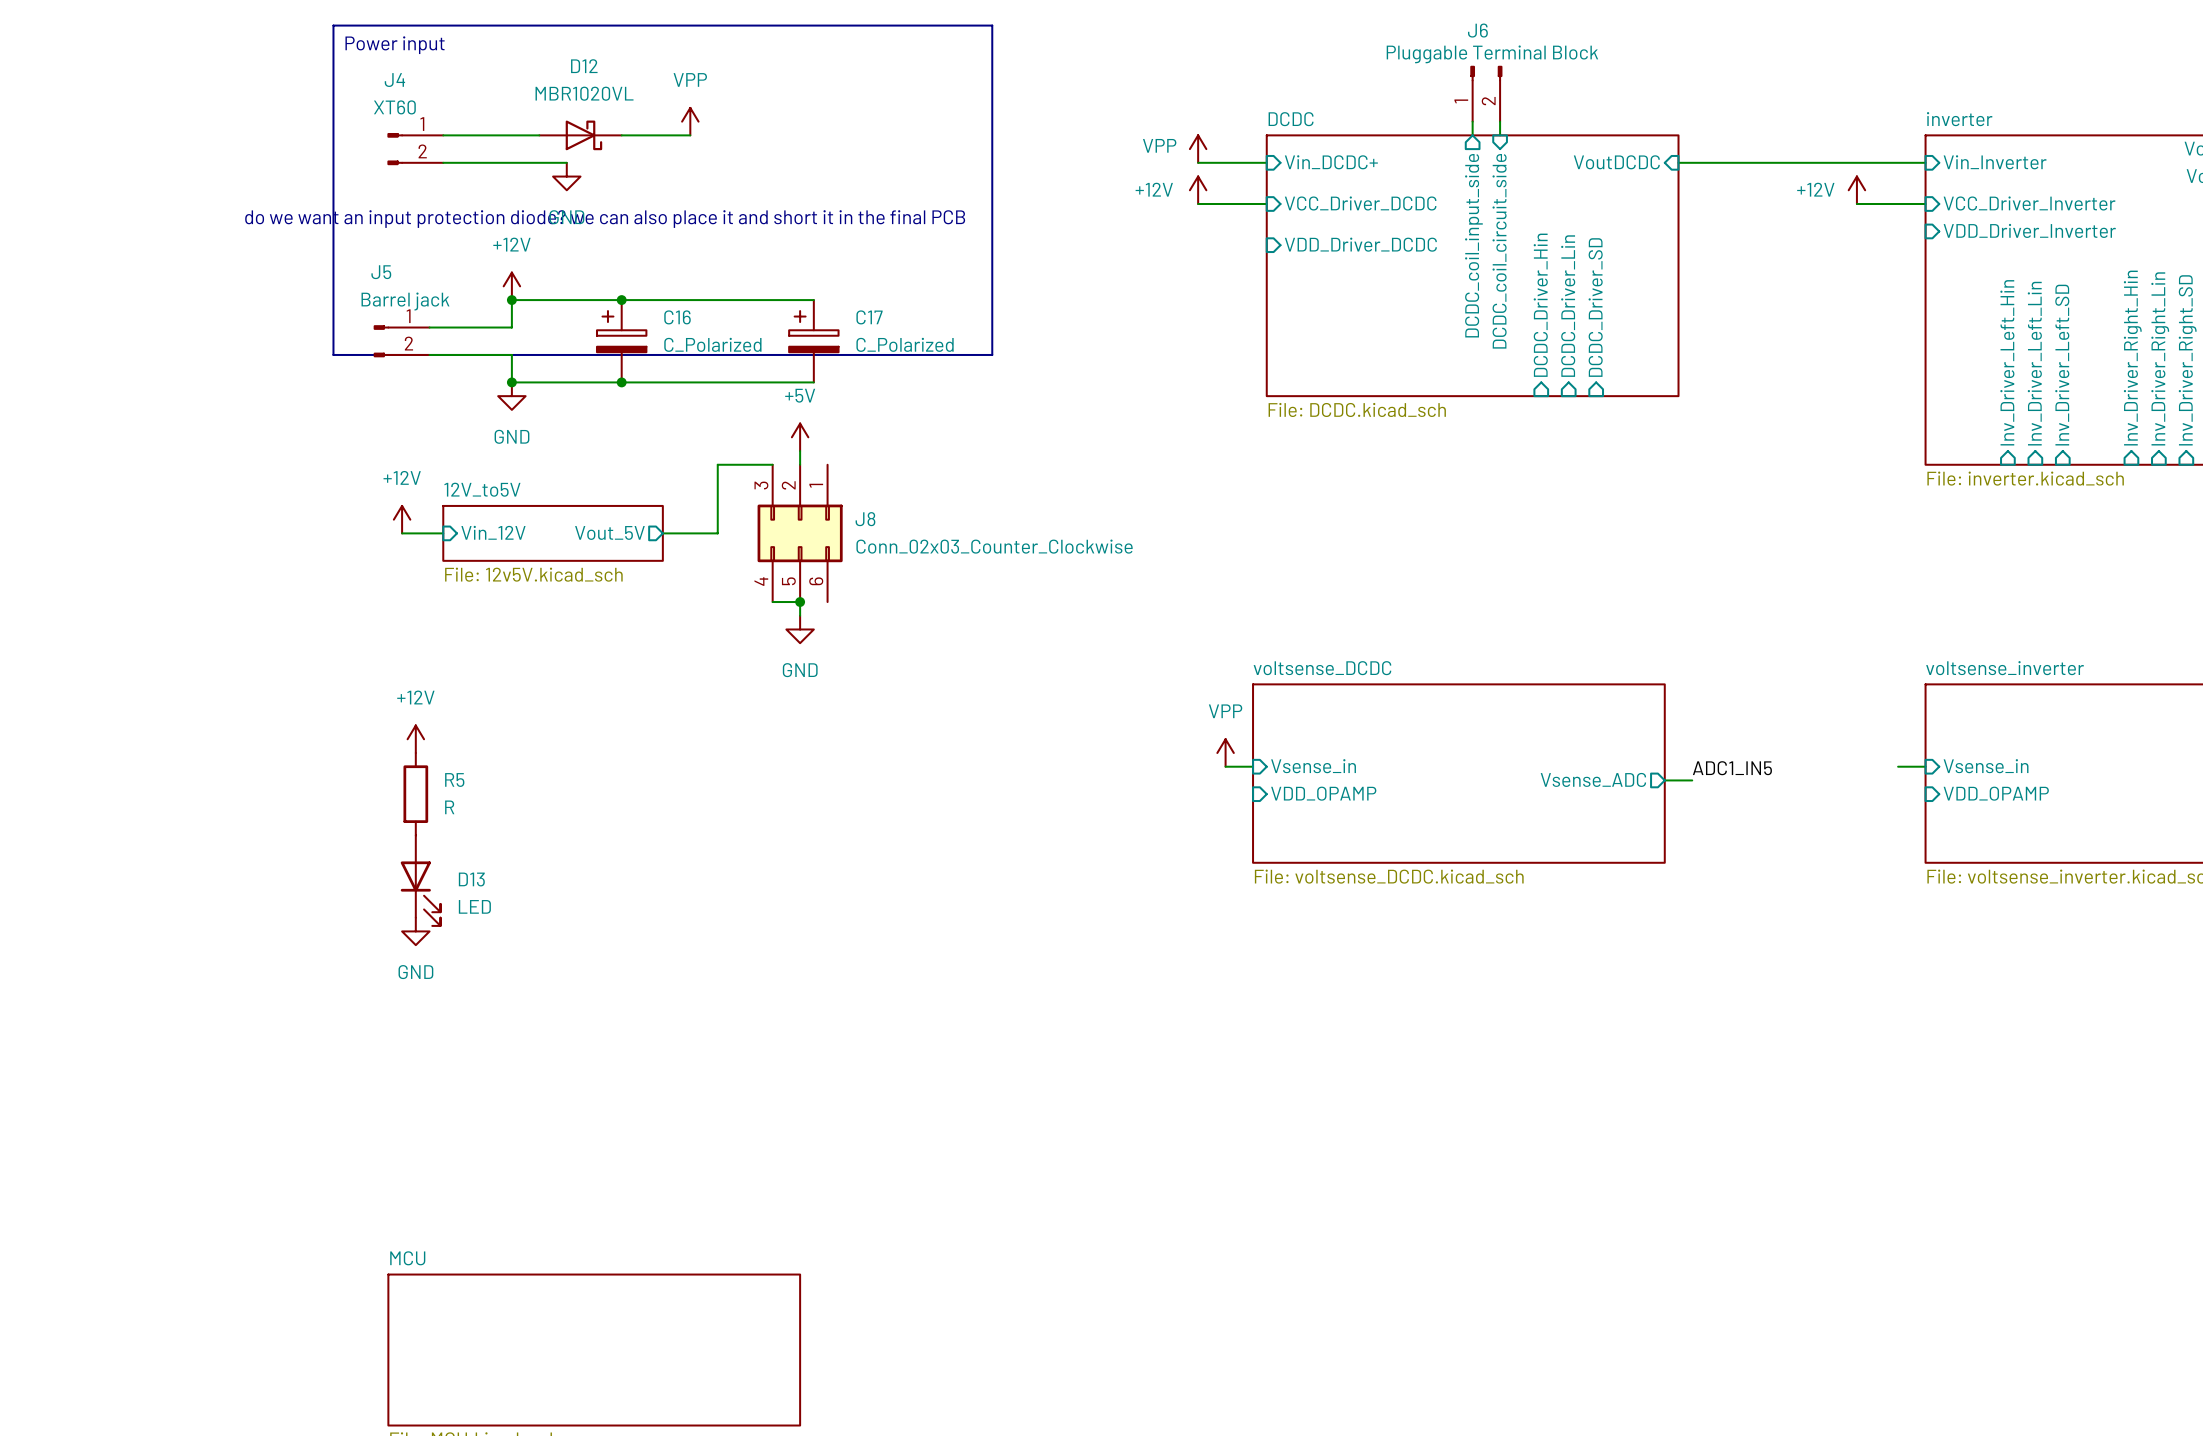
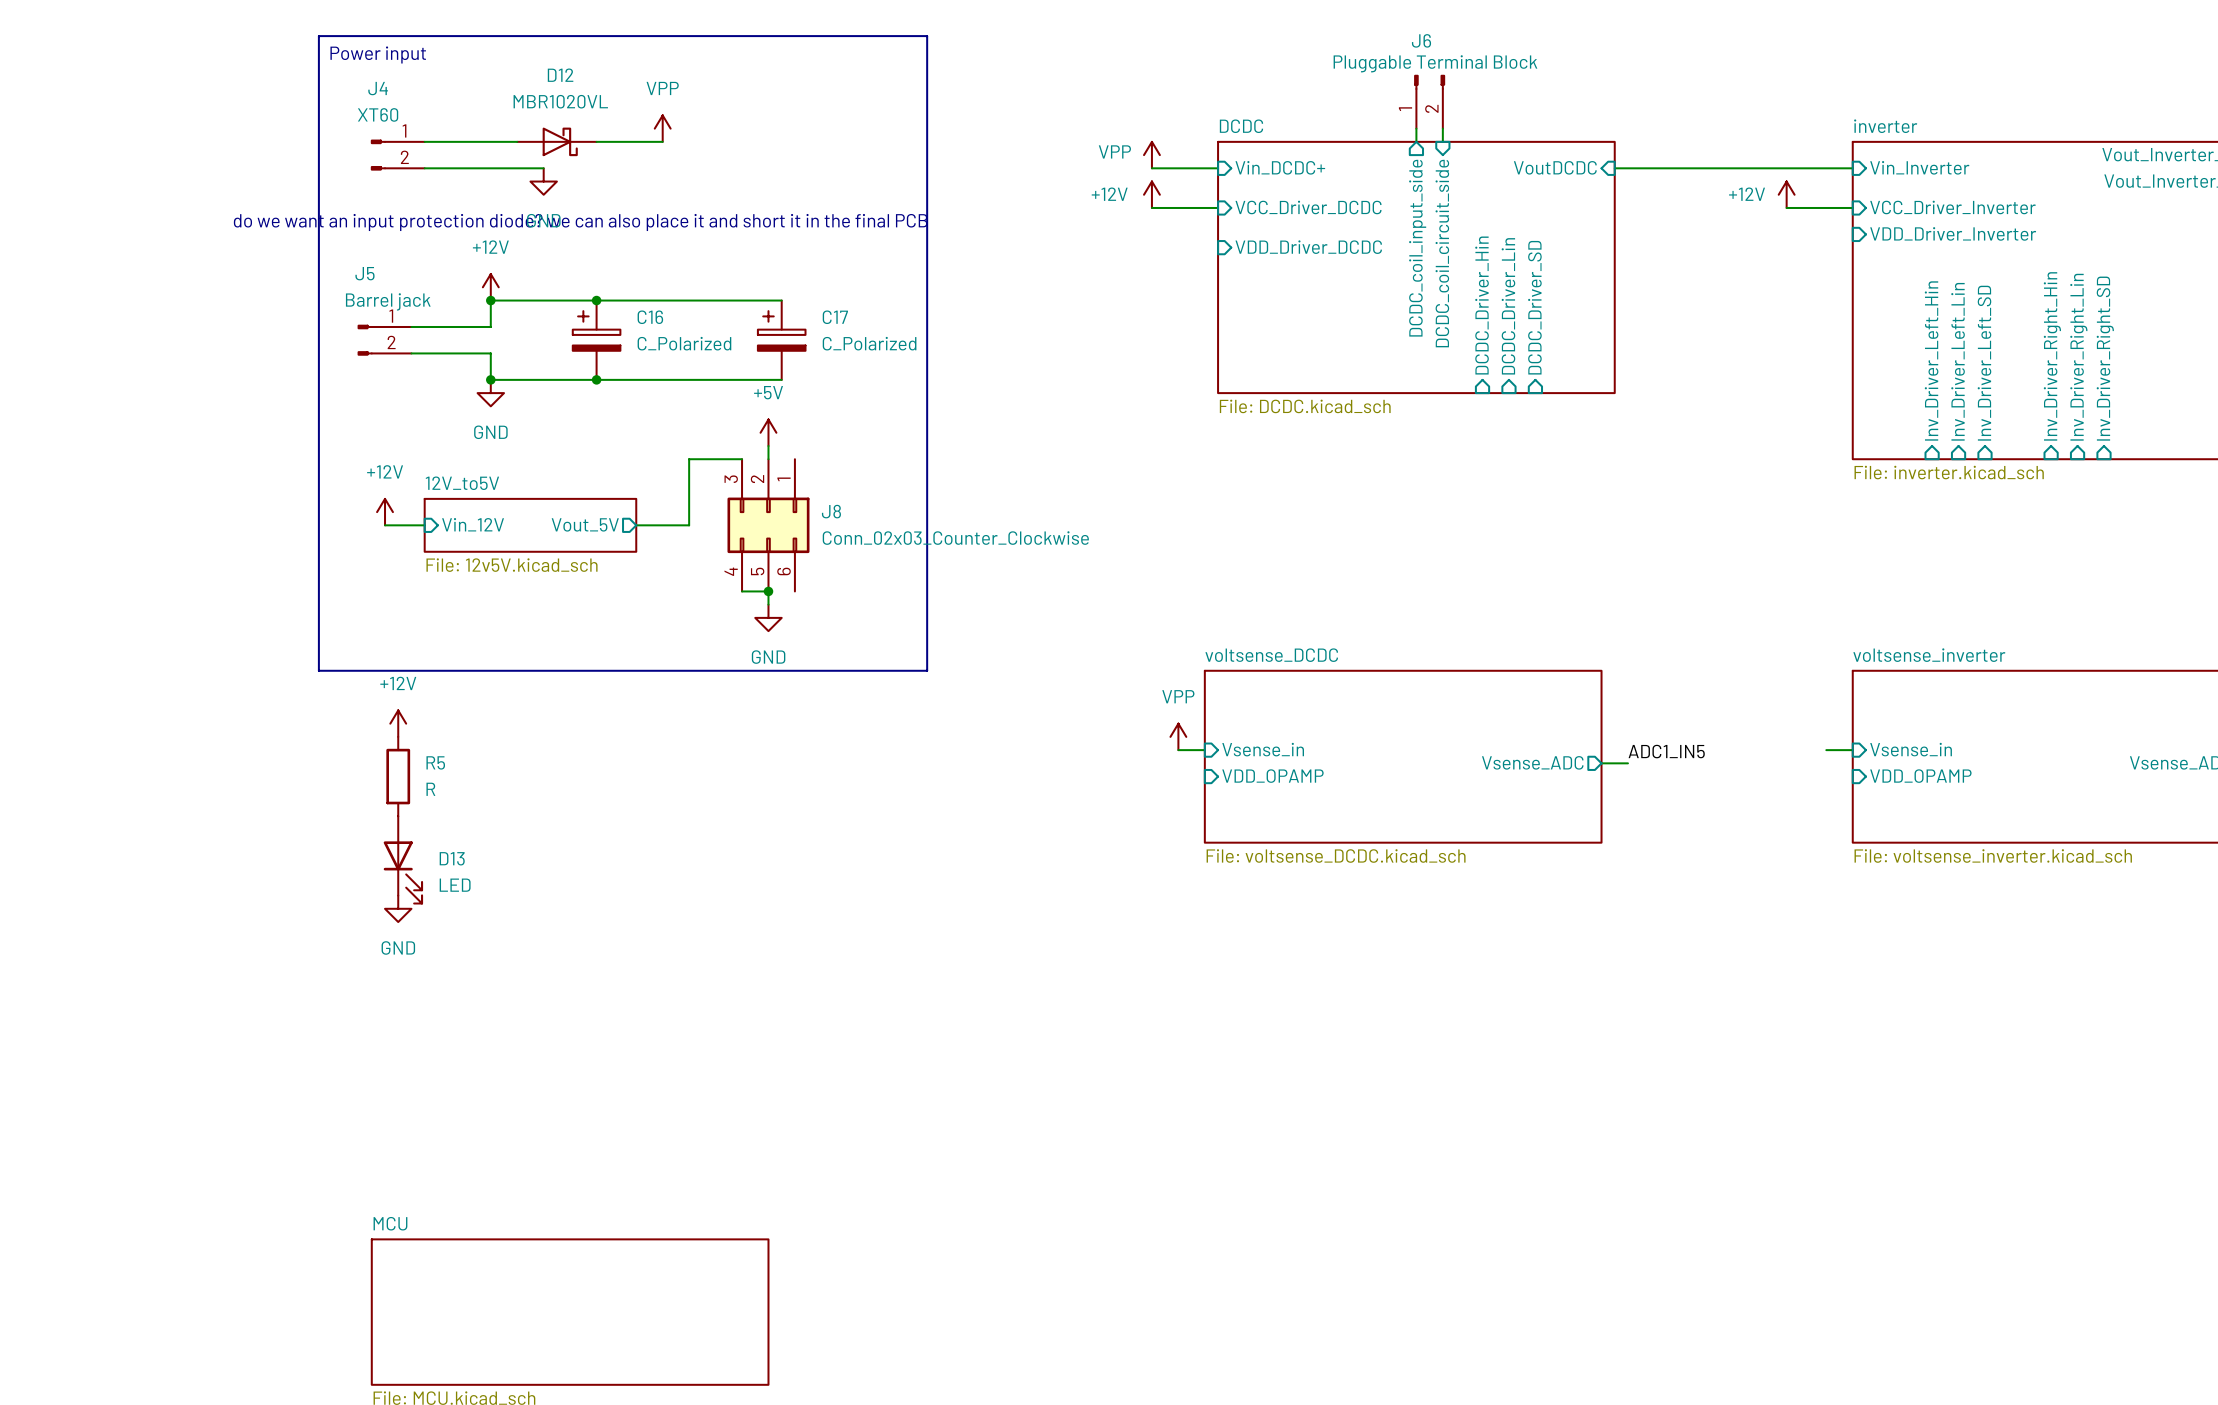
line: (964, 25) (992, 25) (992, 354) (333, 354) -> (927, 36) (927, 670) (318, 670) (318, 353)

